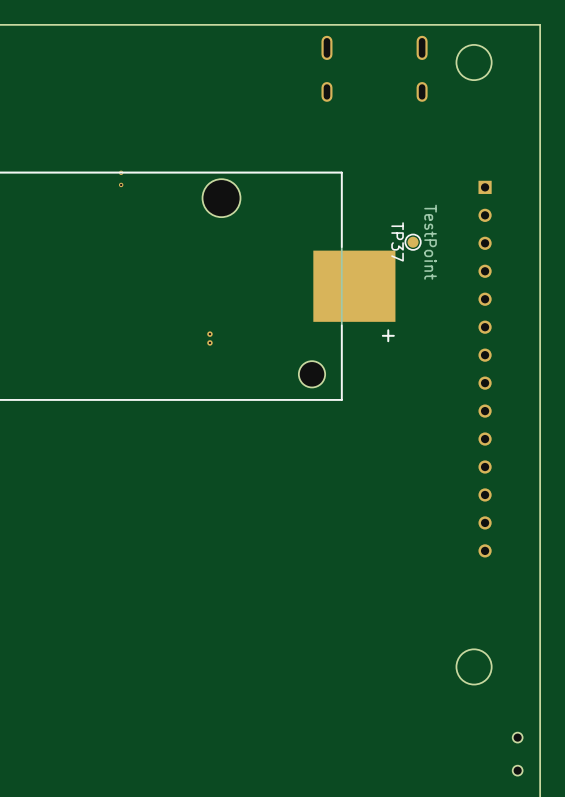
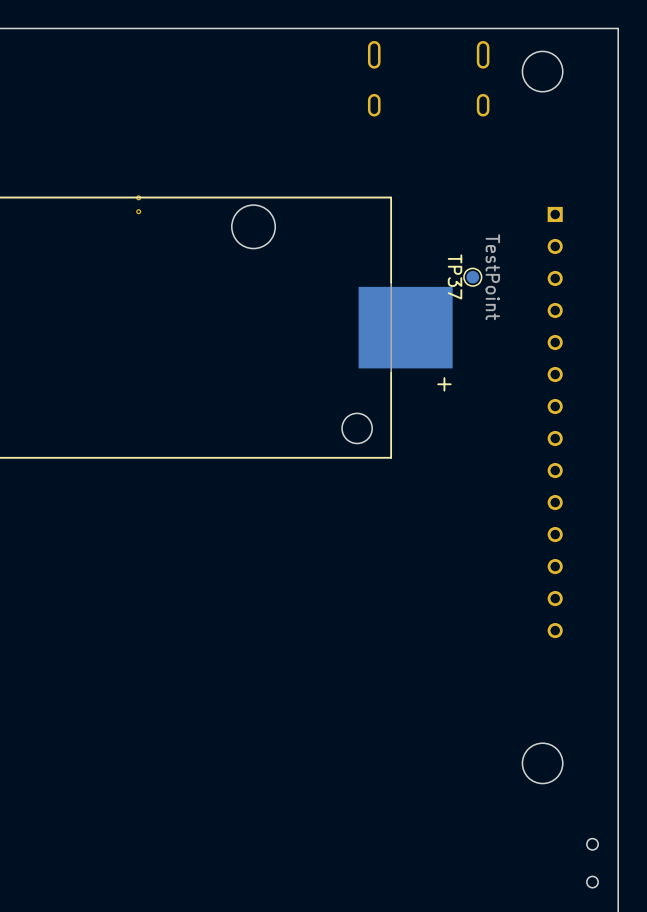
part: (209, 338) -> none

